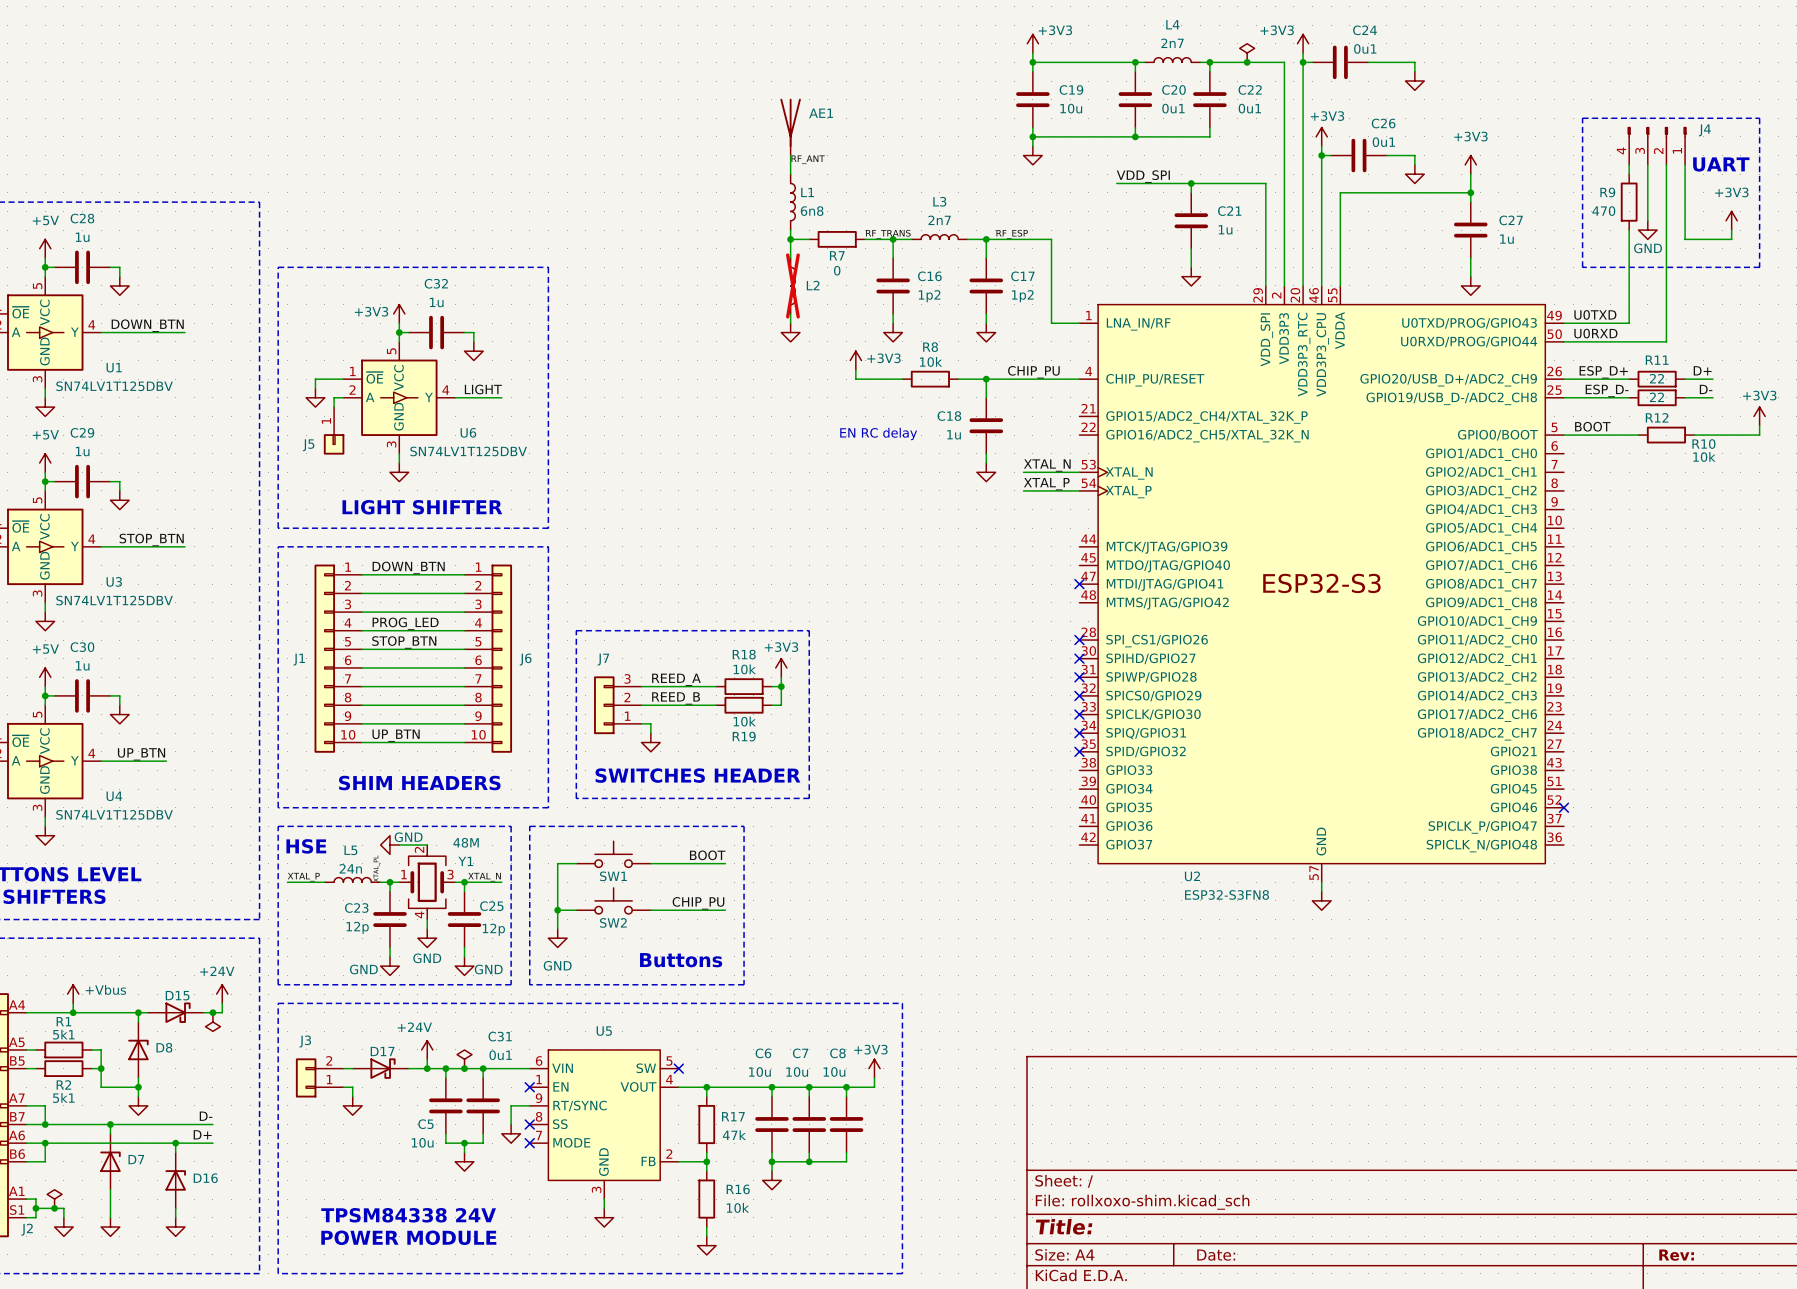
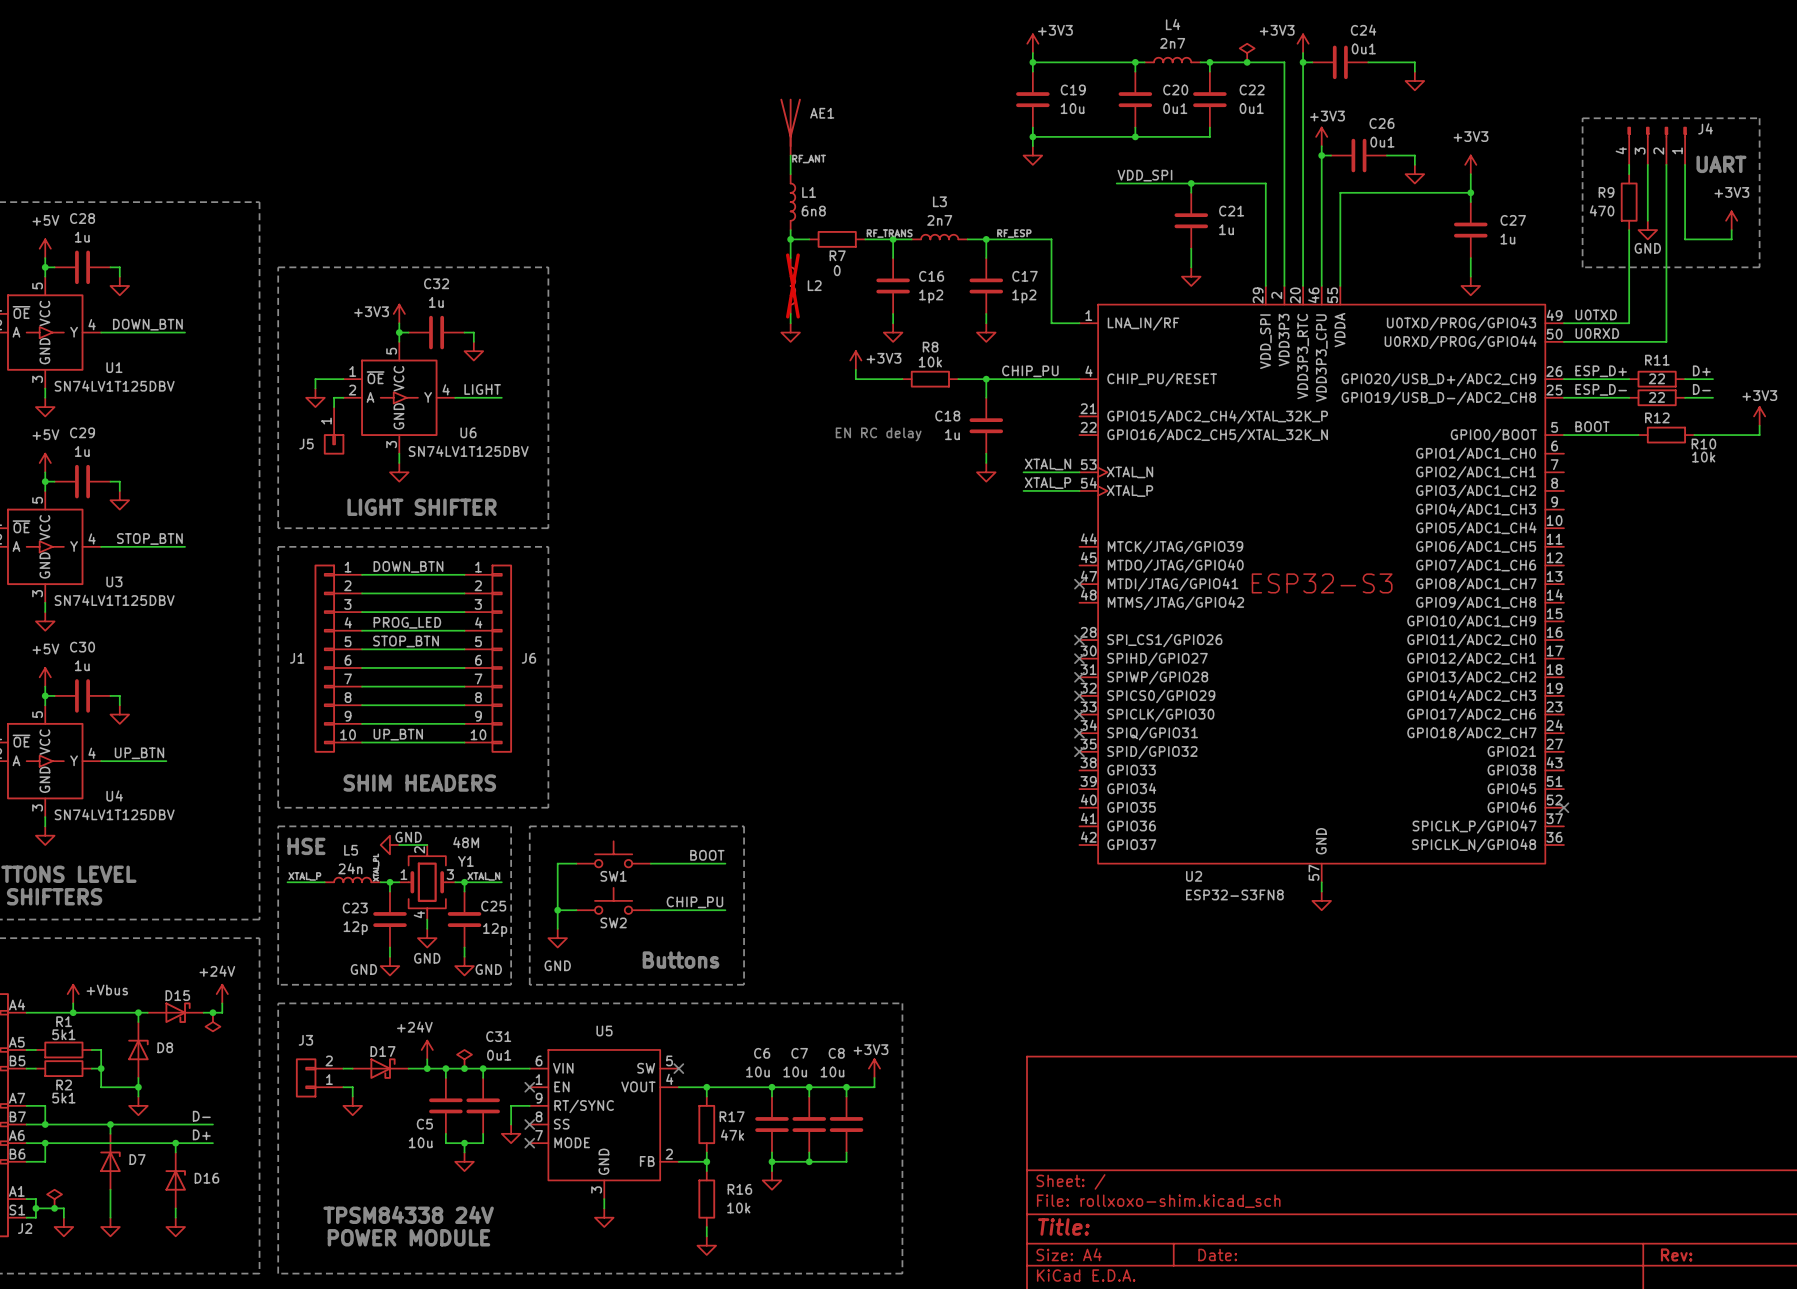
line: (576, 630) (809, 630) (809, 798) (576, 798) (576, 630) -> none
power symbol: +3V3 (781, 667) -> none
wire: (781, 677) (781, 705) (771, 705) -> none
label: REED_A (676, 679) -> none
wire: (641, 686) (716, 686) -> none
R18: 10k (744, 686) -> none
wire: (771, 686) (781, 686) -> none
junction: (781, 686) -> none
label: REED_B (676, 698) -> none
J7: (617, 705) -> none
wire: (641, 705) (716, 705) -> none
R19: 10k (744, 705) -> none
wire: (641, 723) (650, 723) (650, 733) -> none
power symbol: (650, 742) -> none
text: SWITCHES HEADER (697, 775) -> none

